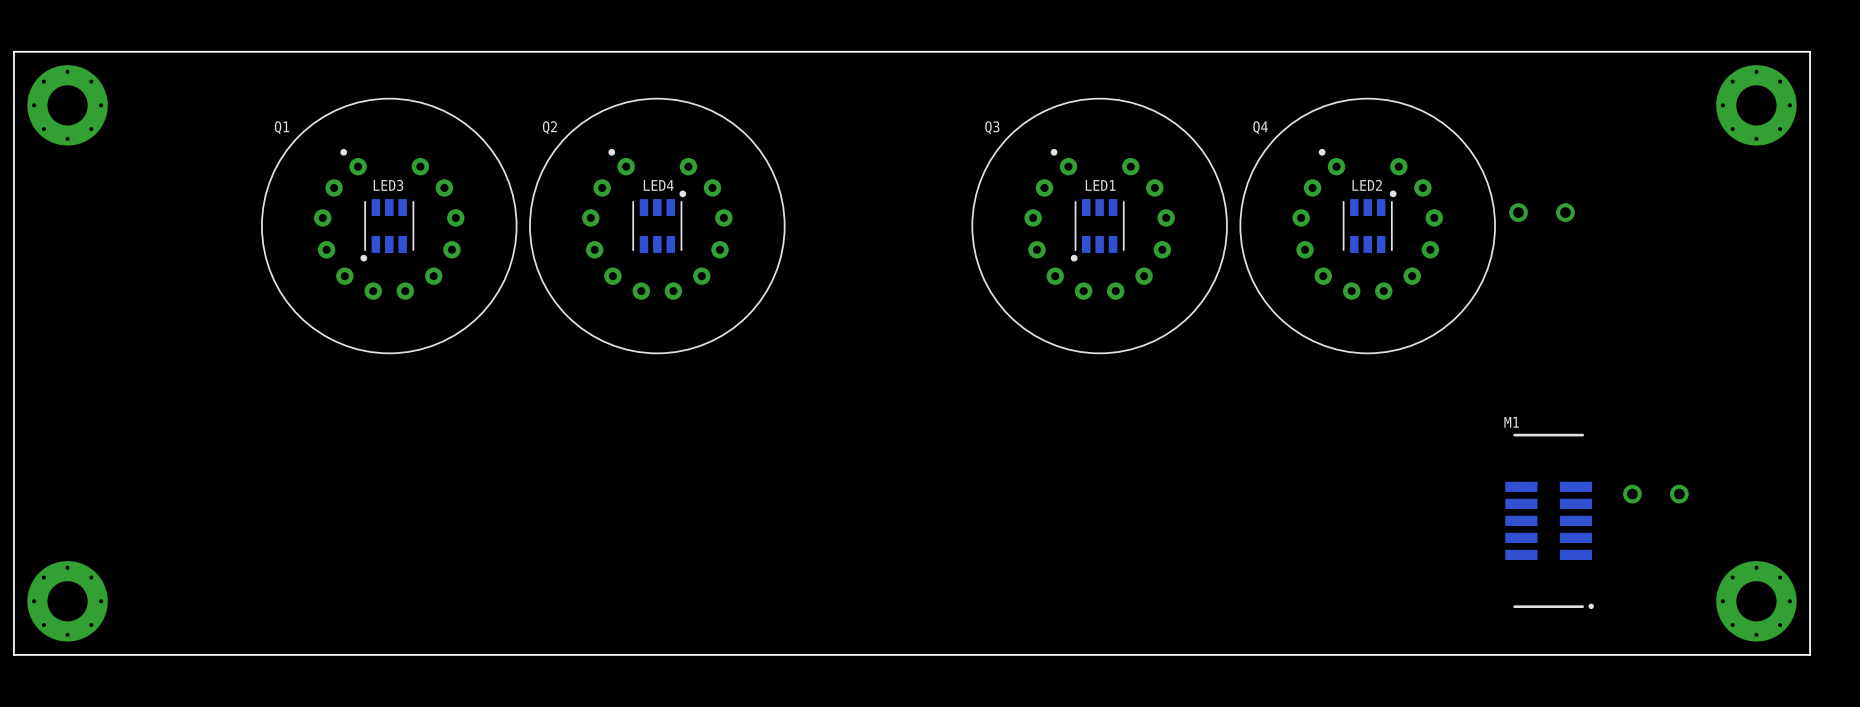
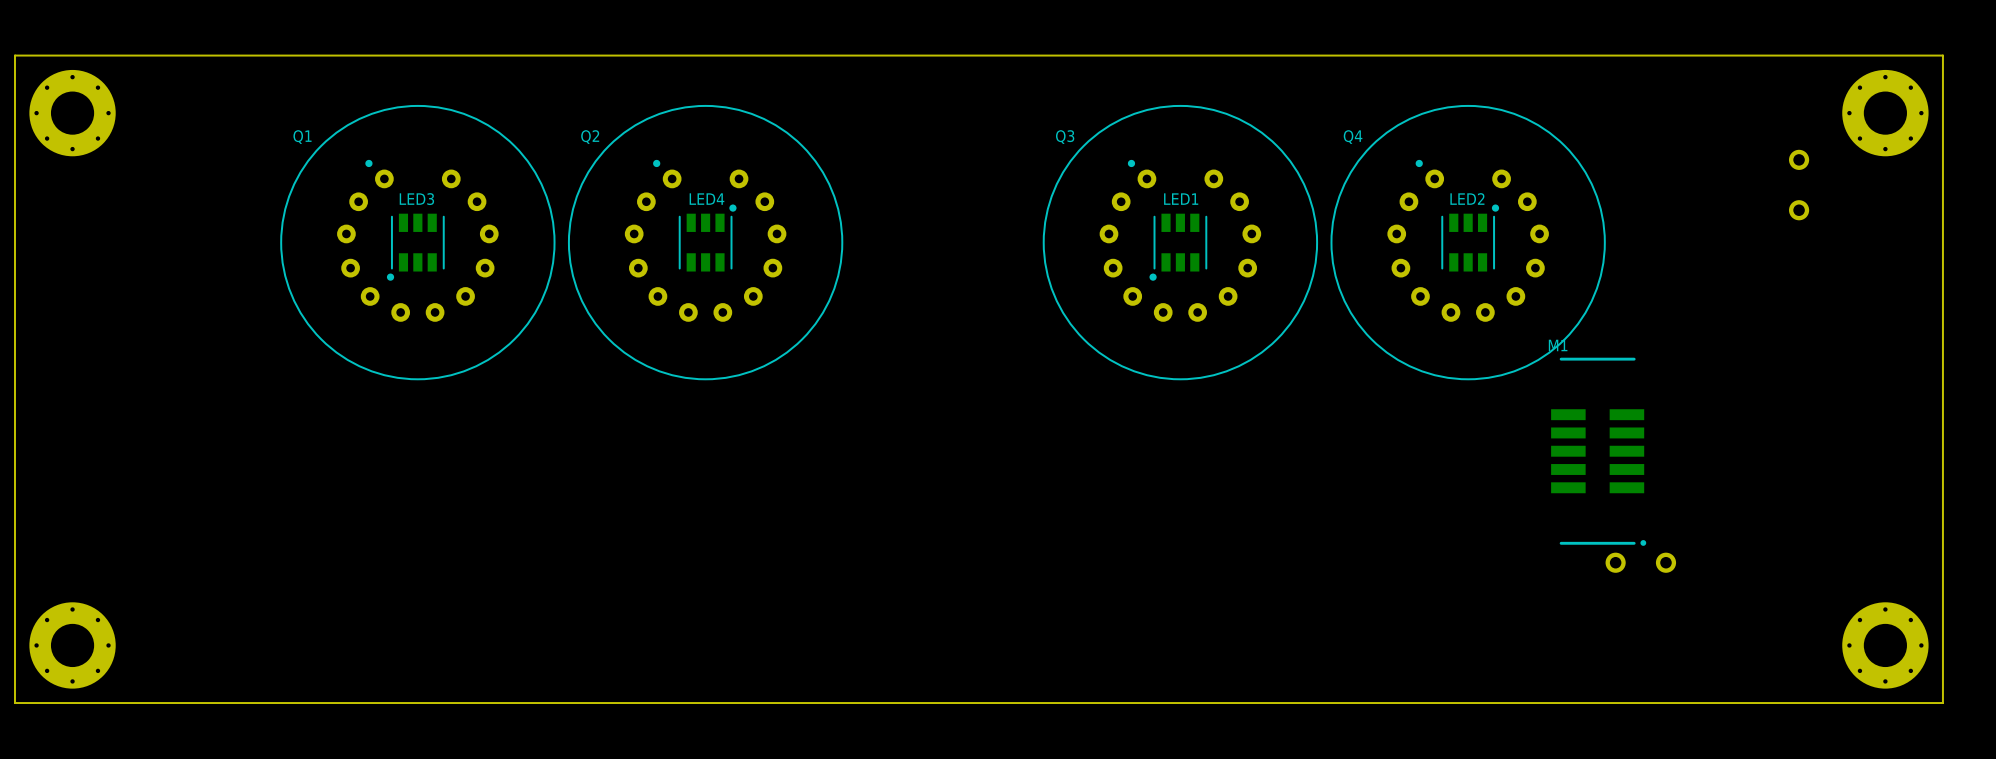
part rotation: 0° (1541, 212) -> 90° clockwise (1799, 185)
part position: (1541, 212) -> (1799, 185)
part position: (1655, 494) -> (1640, 562)
M1 position: (1549, 521) -> (1598, 451)

